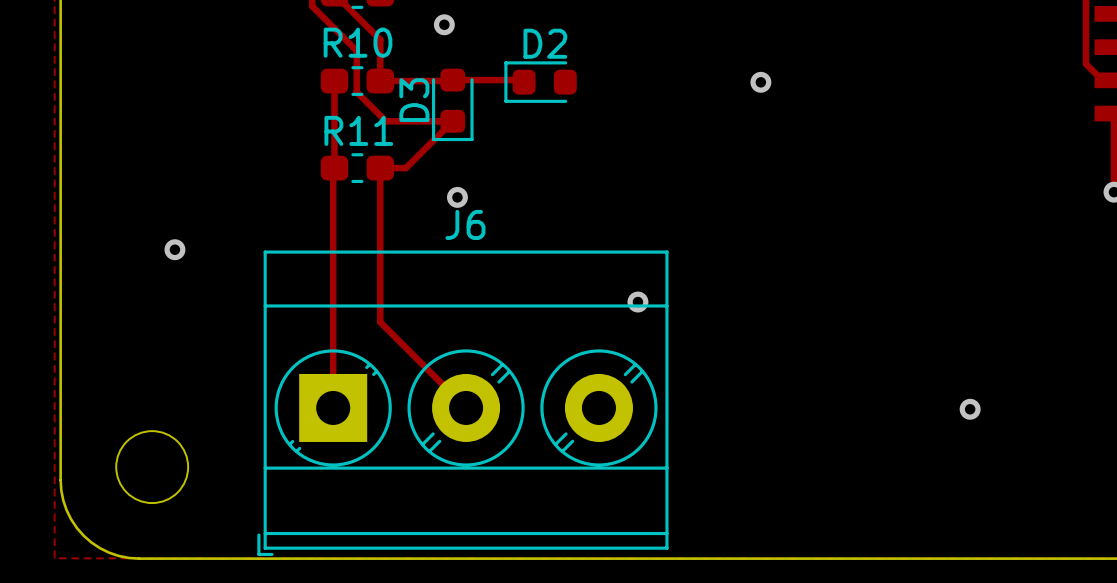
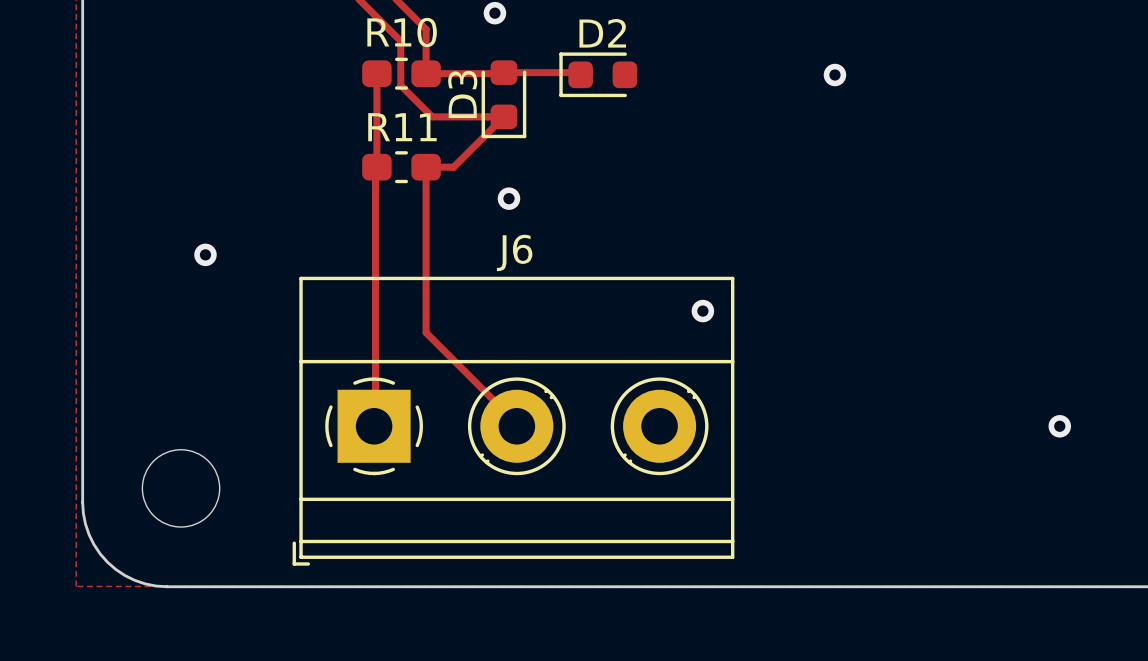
J6 footprint: [257, 250, 669, 557] -> [292, 276, 735, 566]

